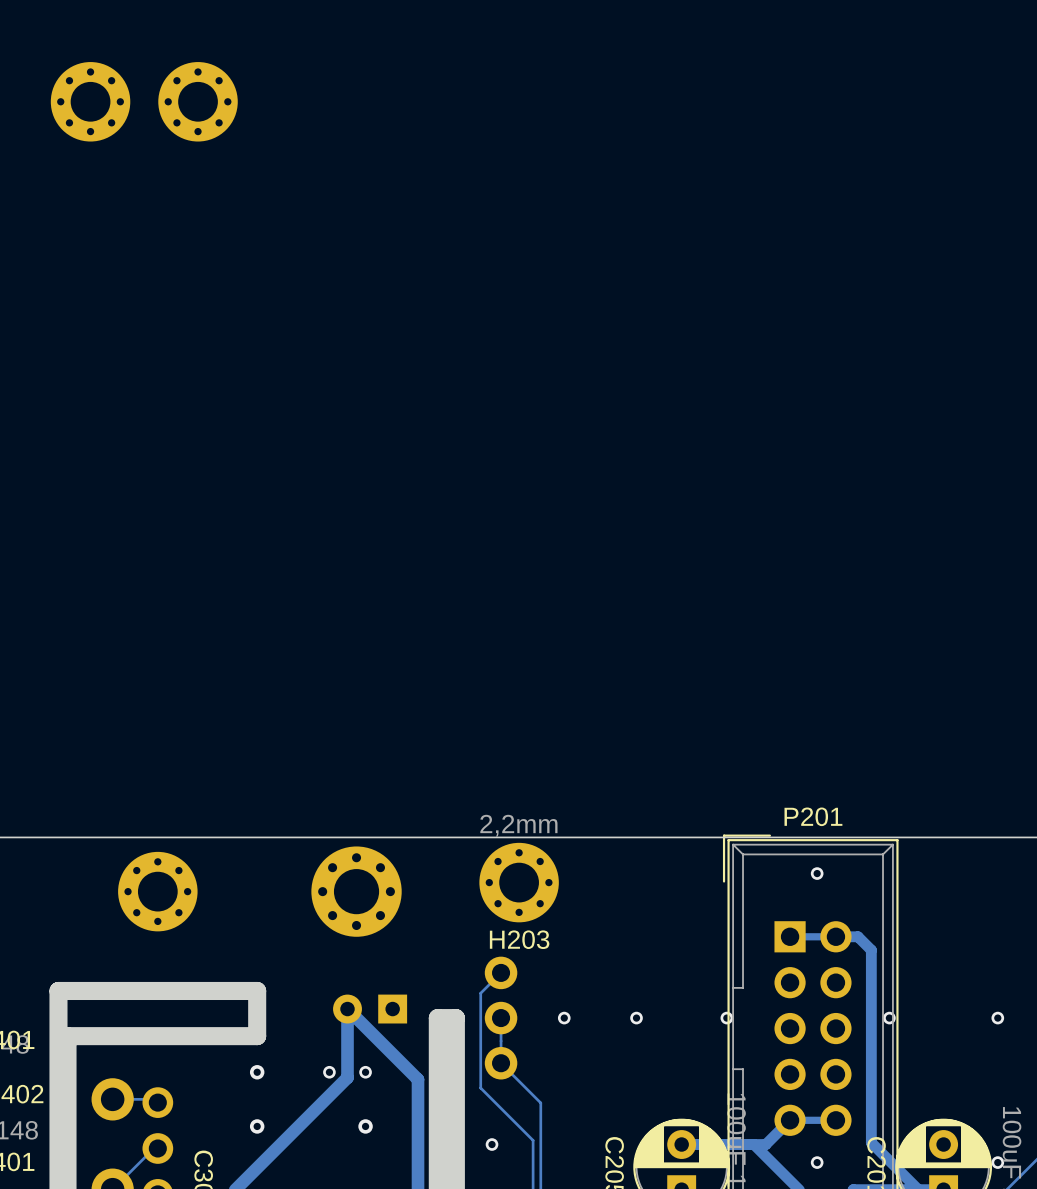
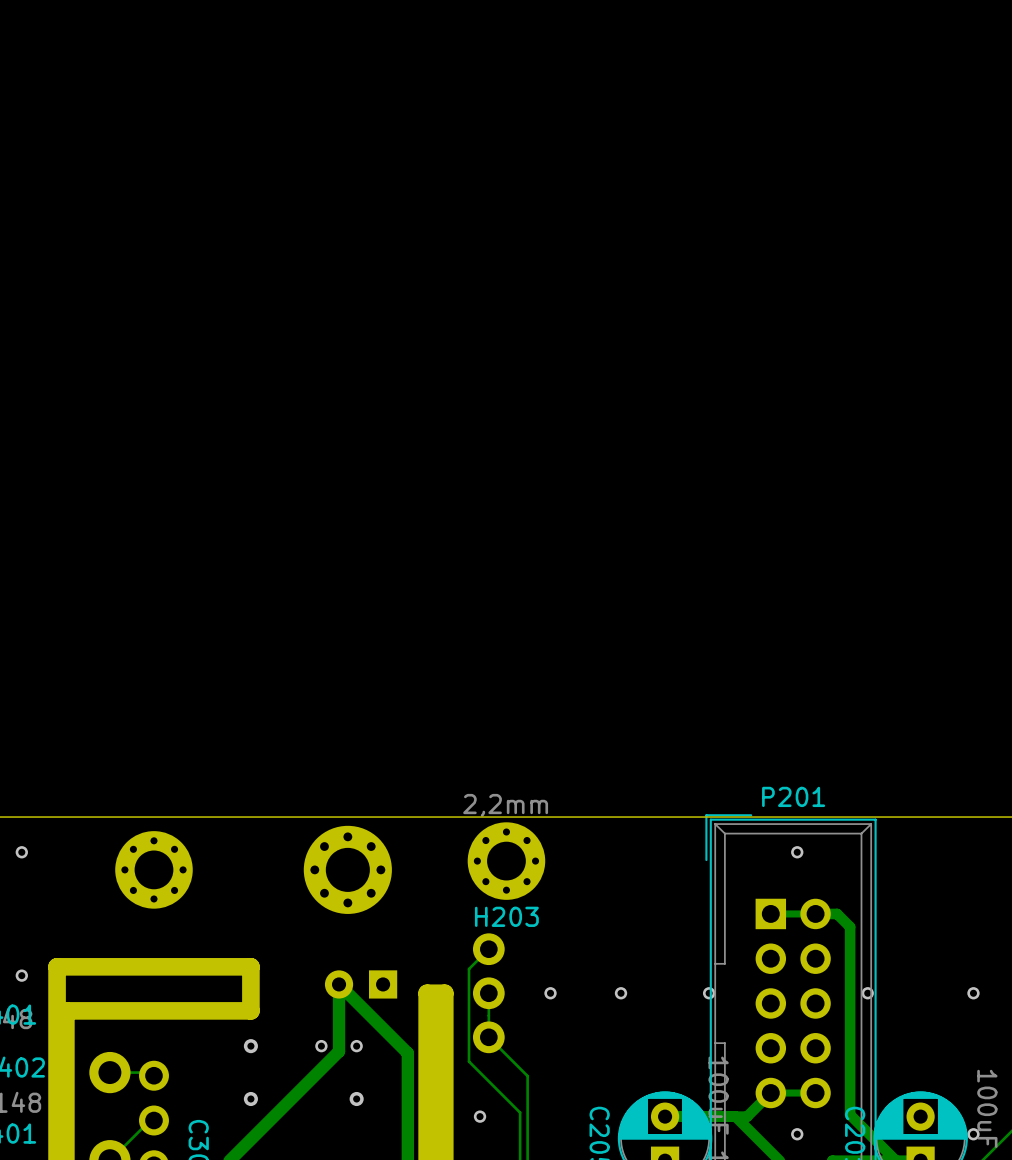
part: (90, 101) -> none
part: (198, 101) -> none
via: none -> (21, 852)
via: none -> (21, 975)

